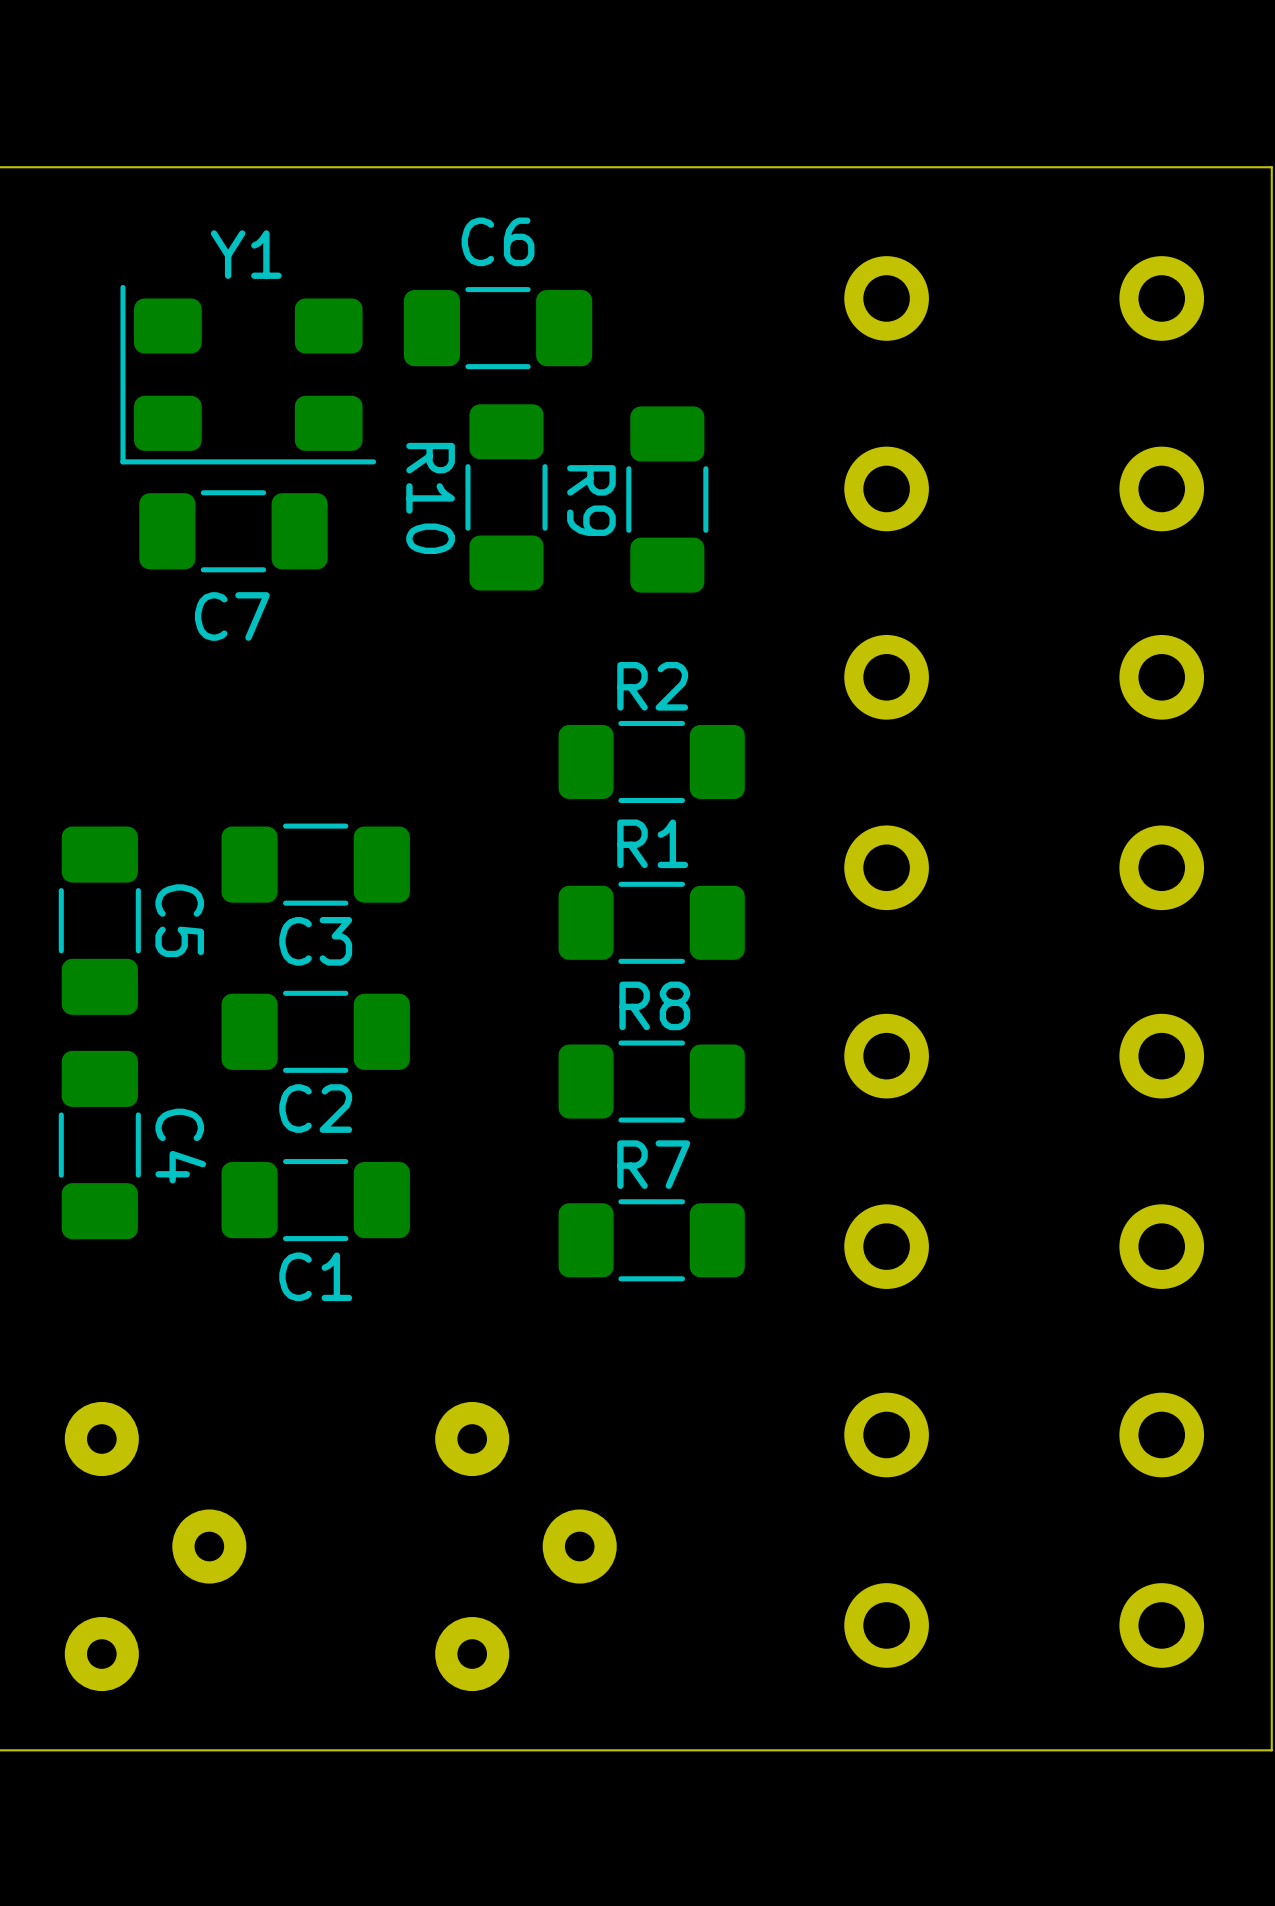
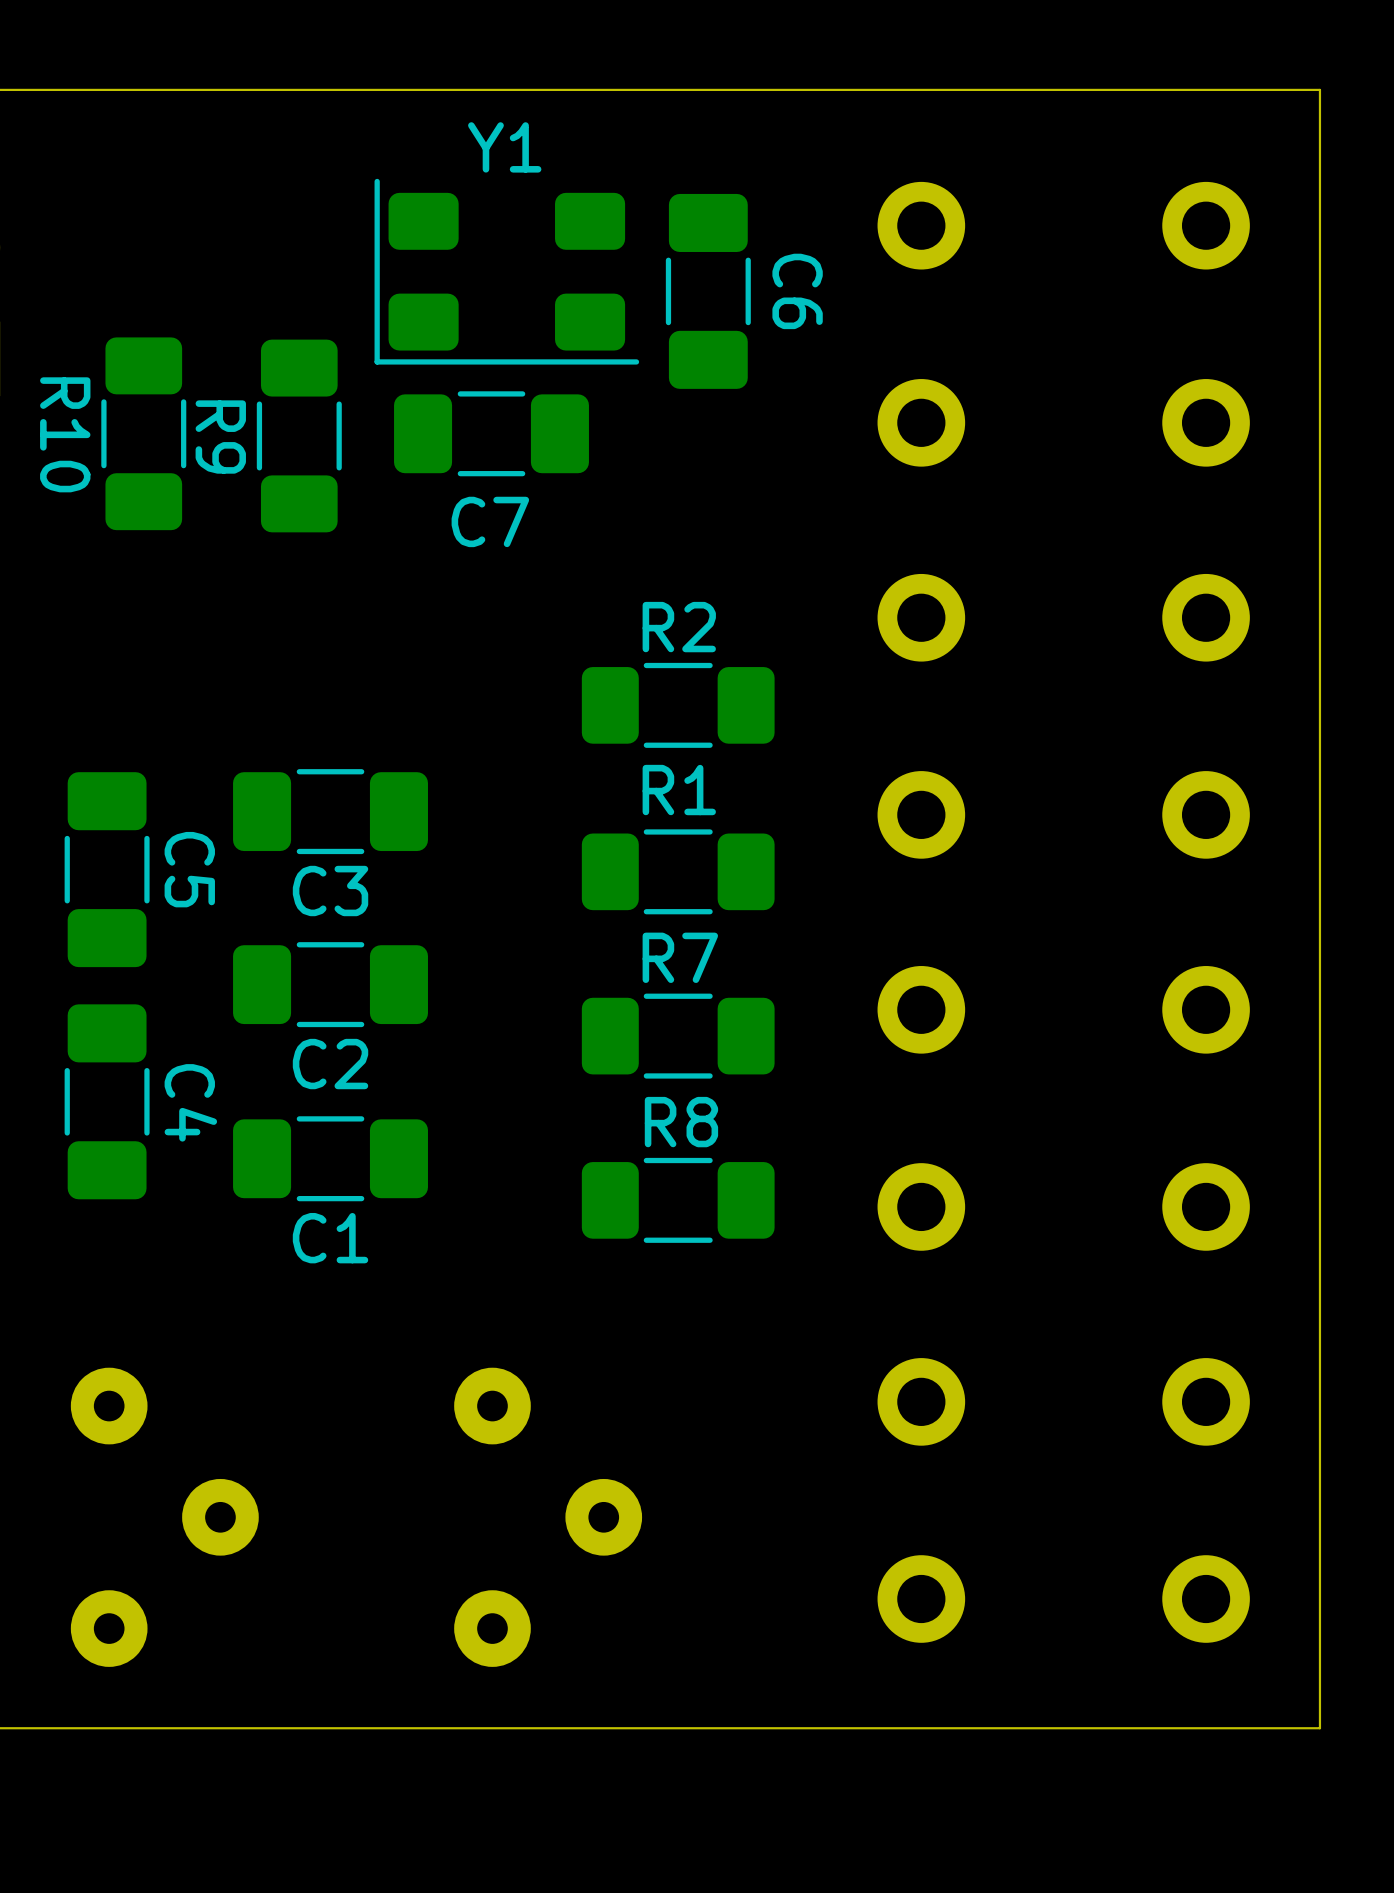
C6 rotation: 0° (498, 328) -> 90° clockwise (708, 291)
C6 position: (498, 328) -> (708, 291)
Y1 position: (248, 374) -> (506, 271)
R10 position: (506, 497) -> (143, 433)
R9 position: (667, 499) -> (299, 435)
C7 position: (233, 531) -> (491, 433)
R8 name: R8 (654, 1005) -> R7 (680, 957)
R7 name: R7 (653, 1164) -> R8 (681, 1122)

